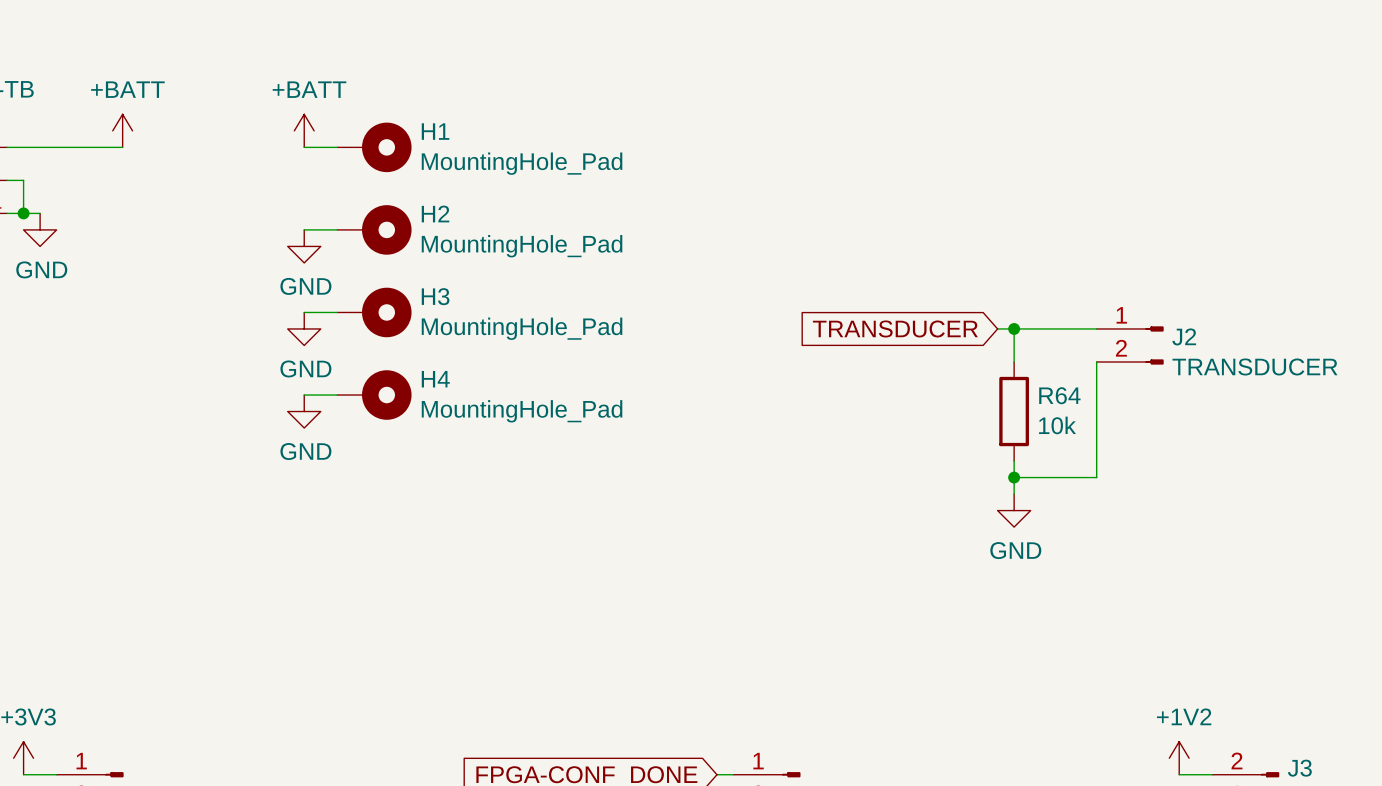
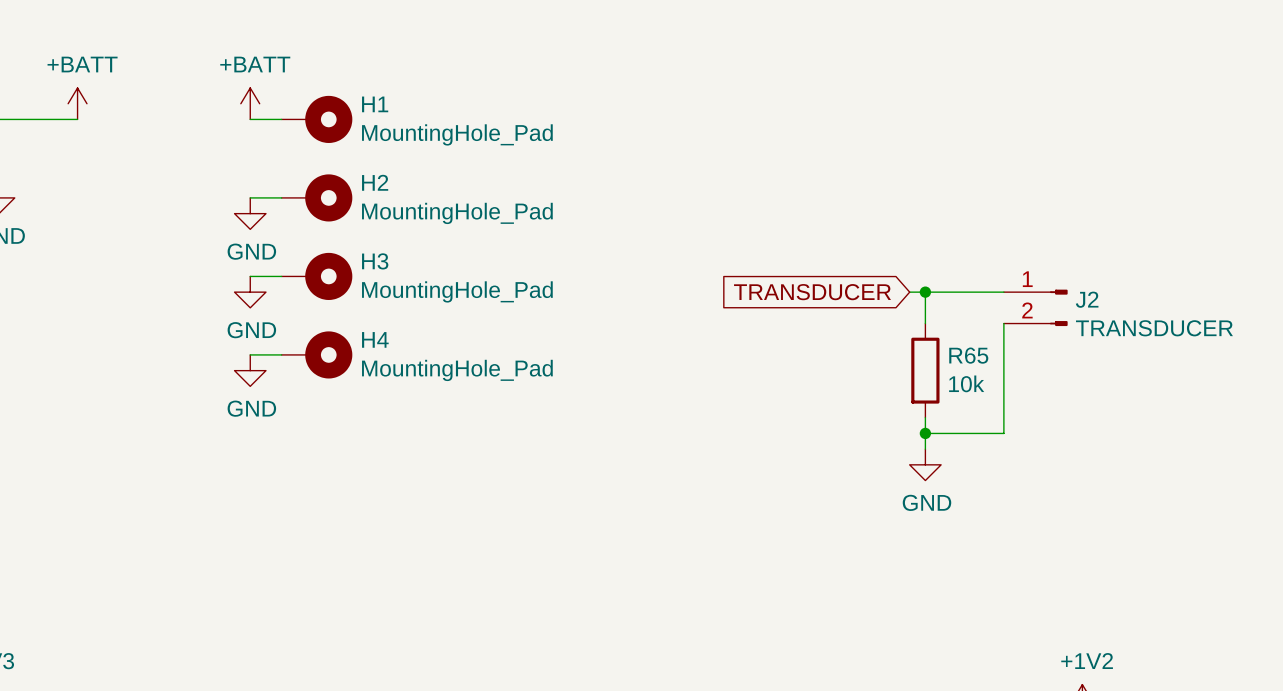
R64 name: R64 (1059, 395) -> R65 (968, 355)

